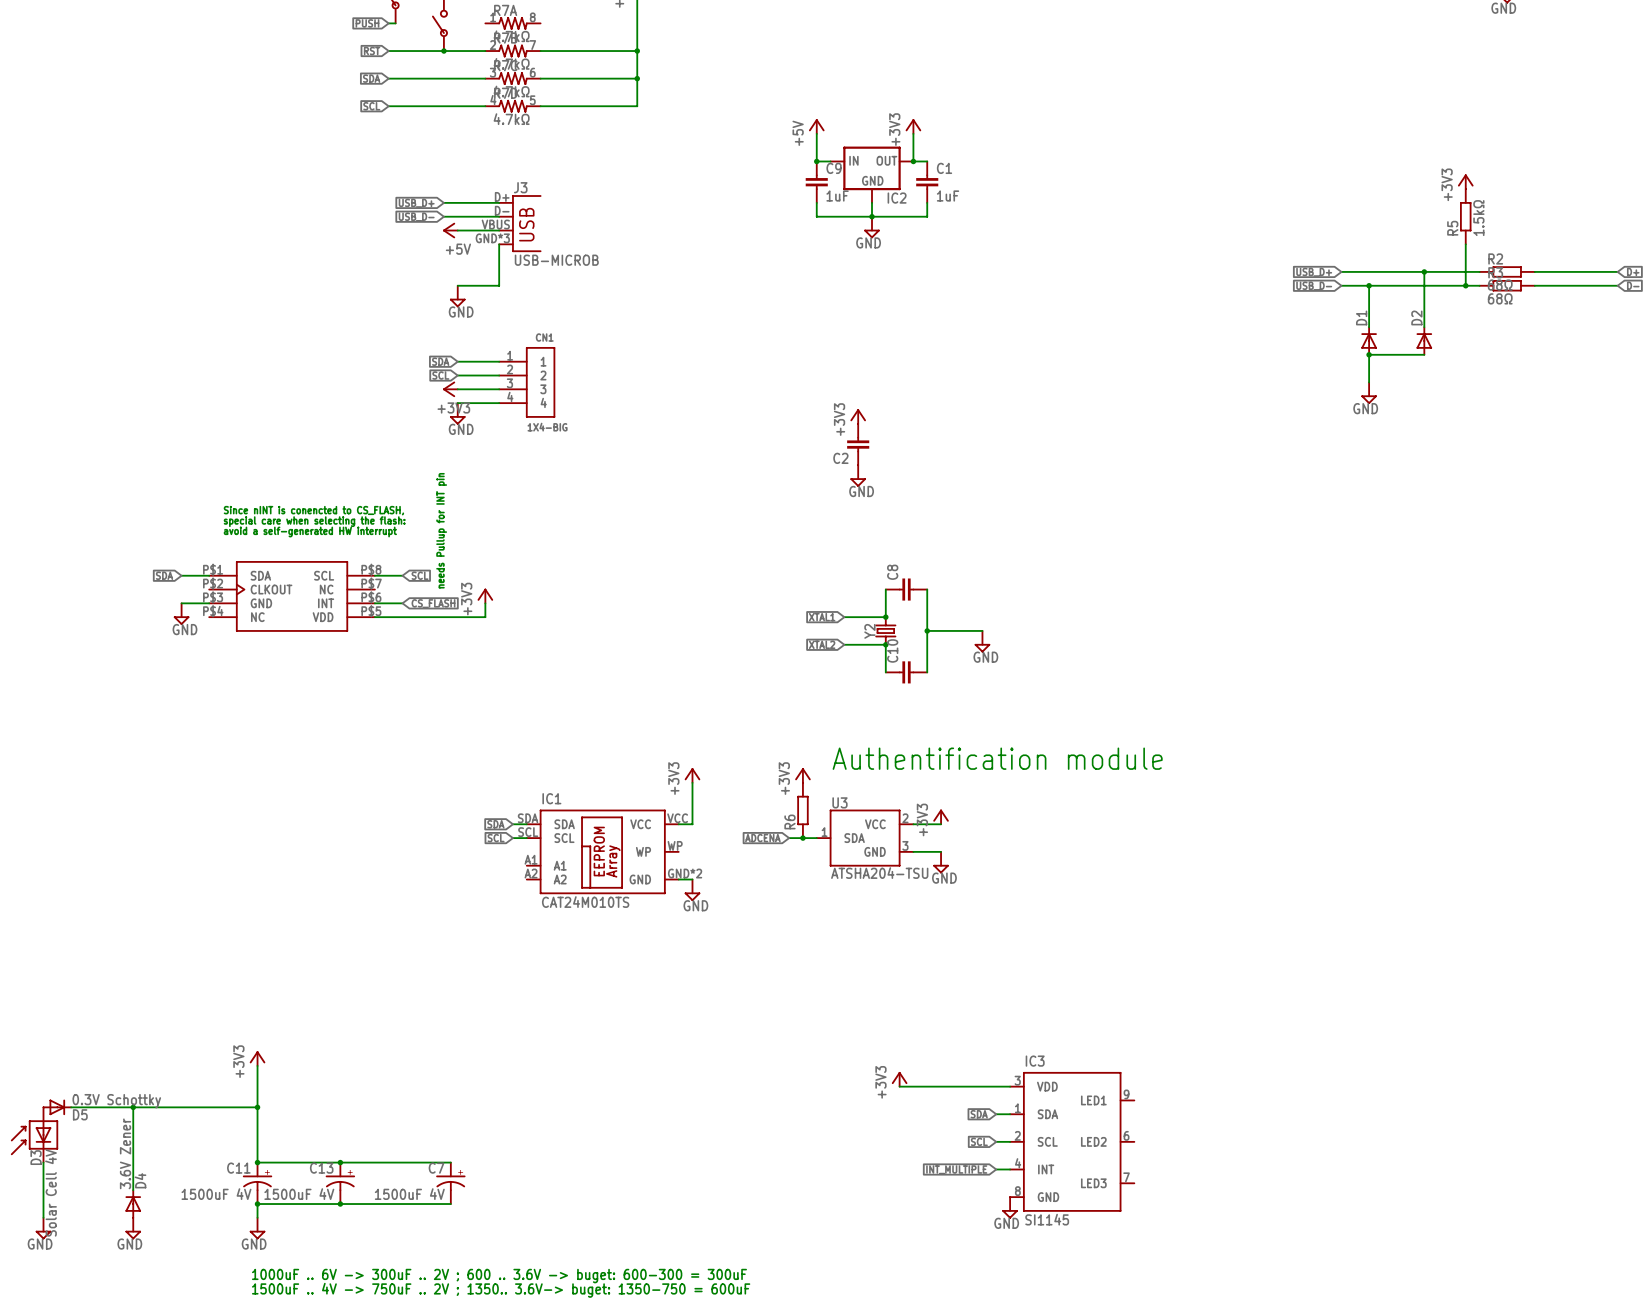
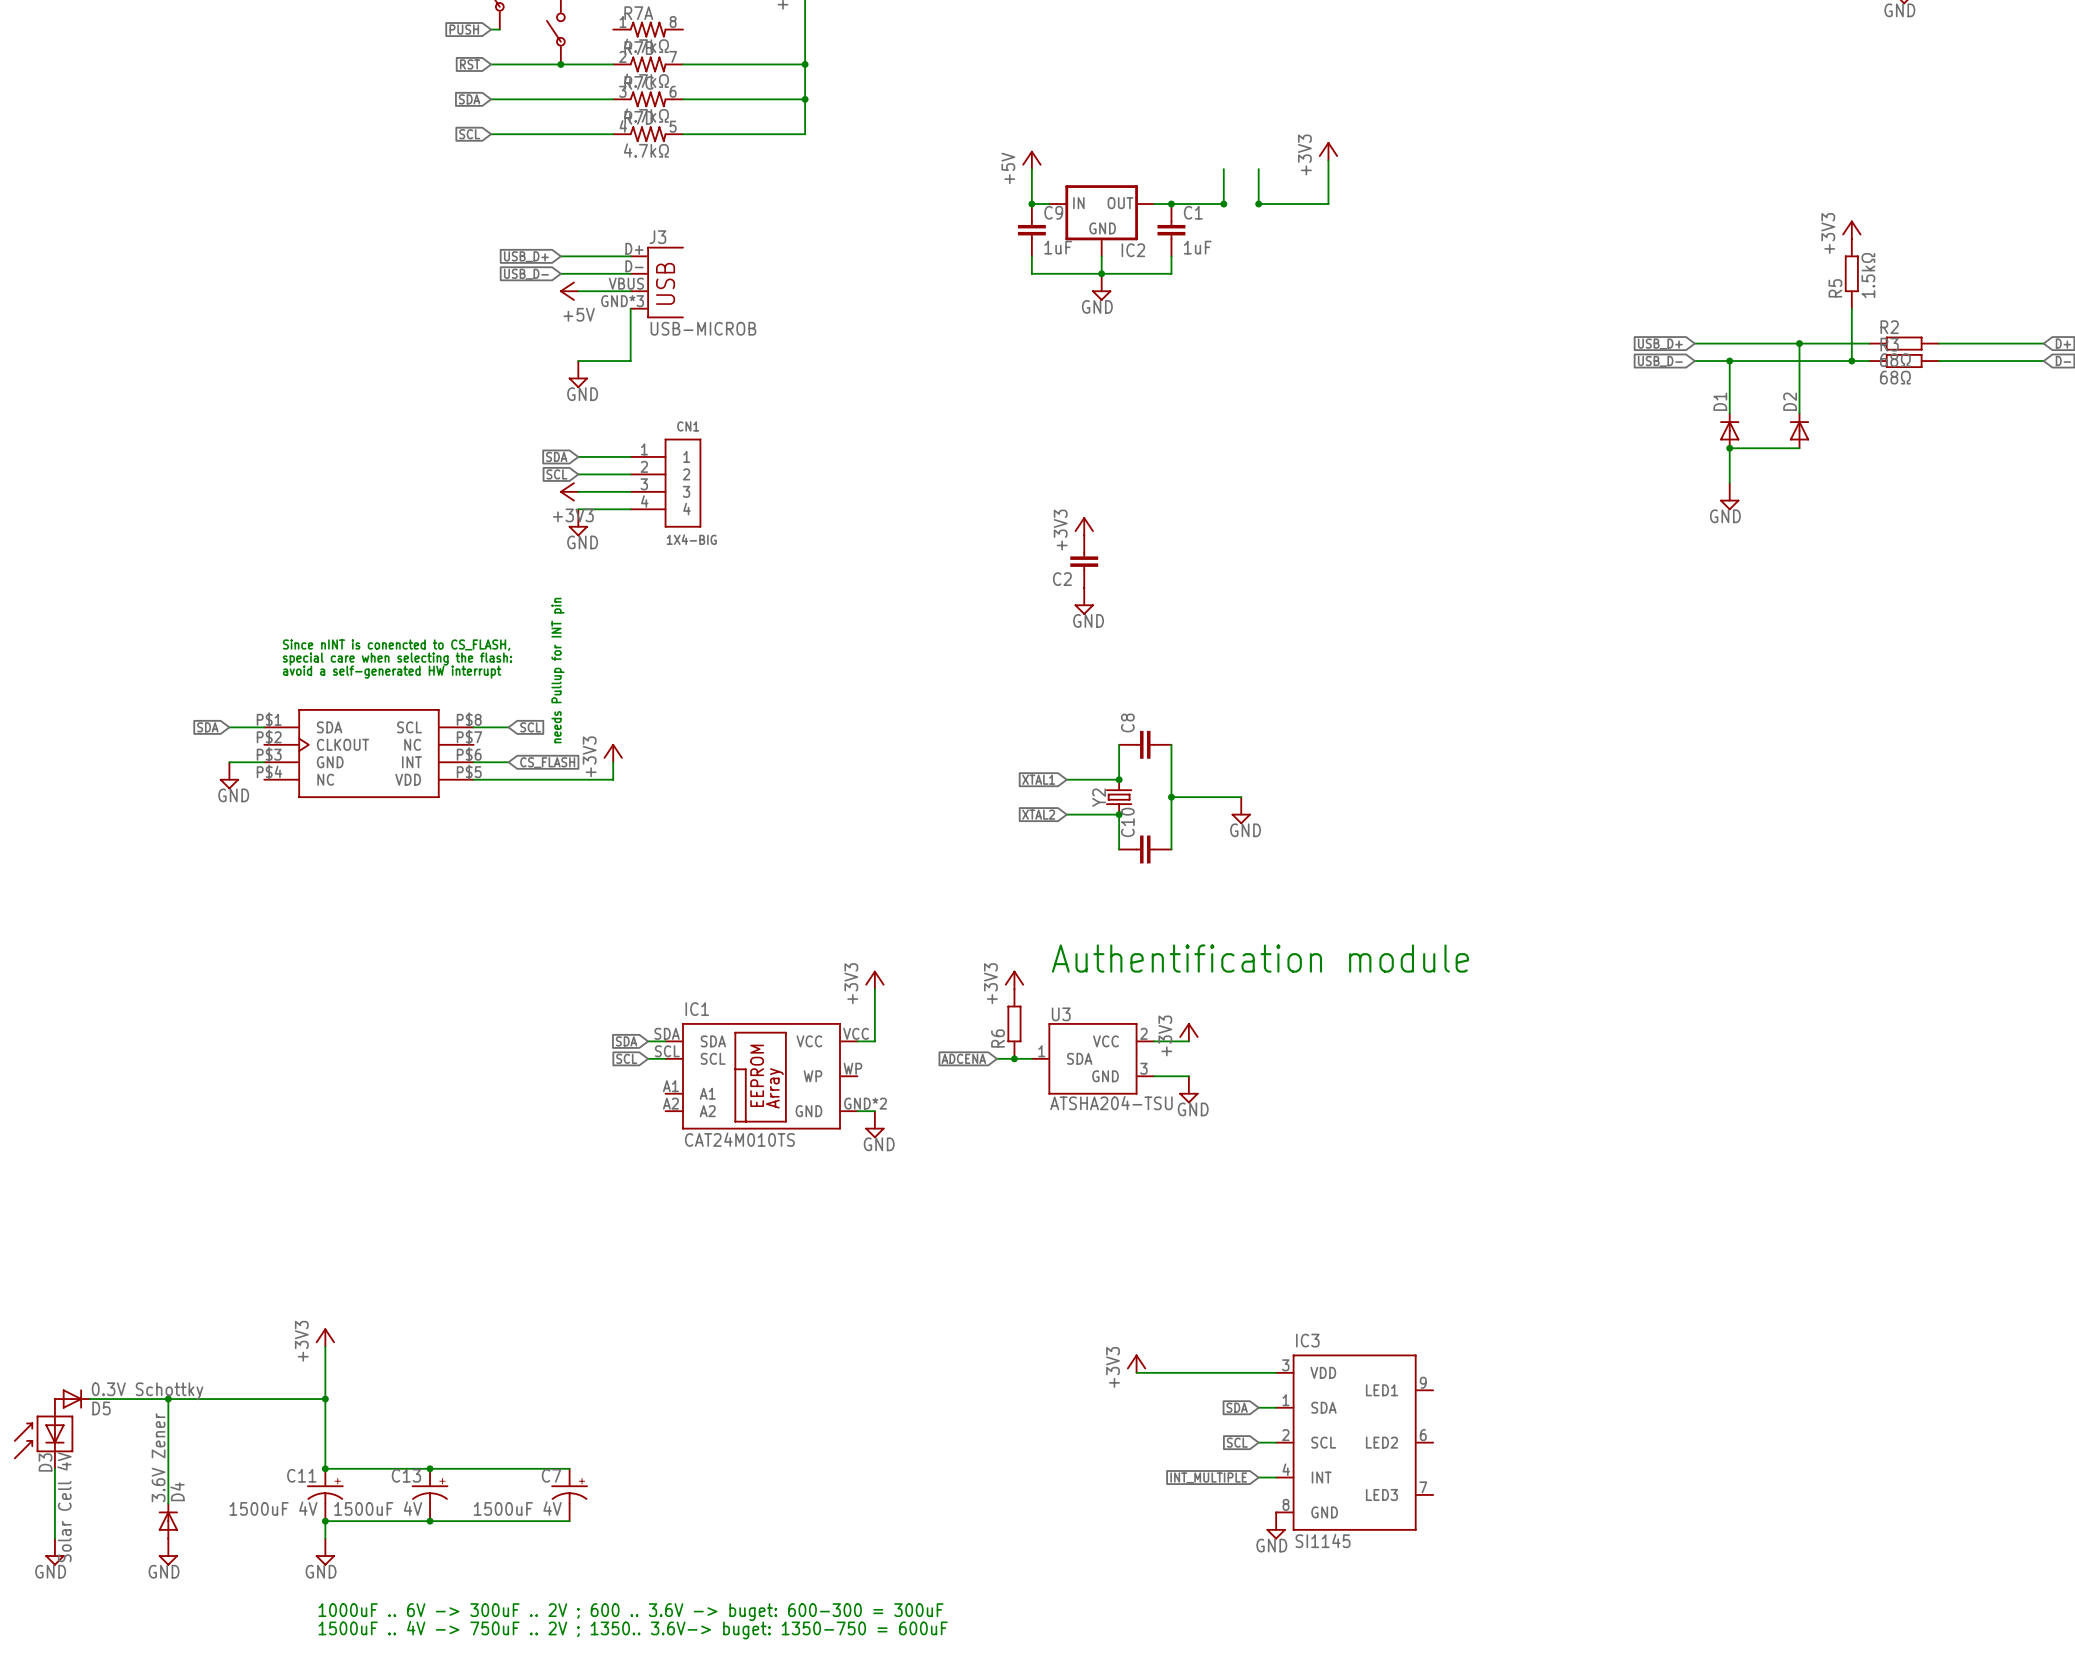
power symbol: none -> +3V3 (1328, 151)
power symbol: +3V3 (913, 126) -> none
wire: none -> (1328, 160) (1328, 204) (1258, 204) (1258, 169)
wire: (913, 133) (913, 161) -> none
wire: none -> (1223, 169) (1223, 204) (1171, 204)
junction position: (913, 161) -> (1171, 204)
junction: none -> (1223, 204)
junction: none -> (1258, 204)

